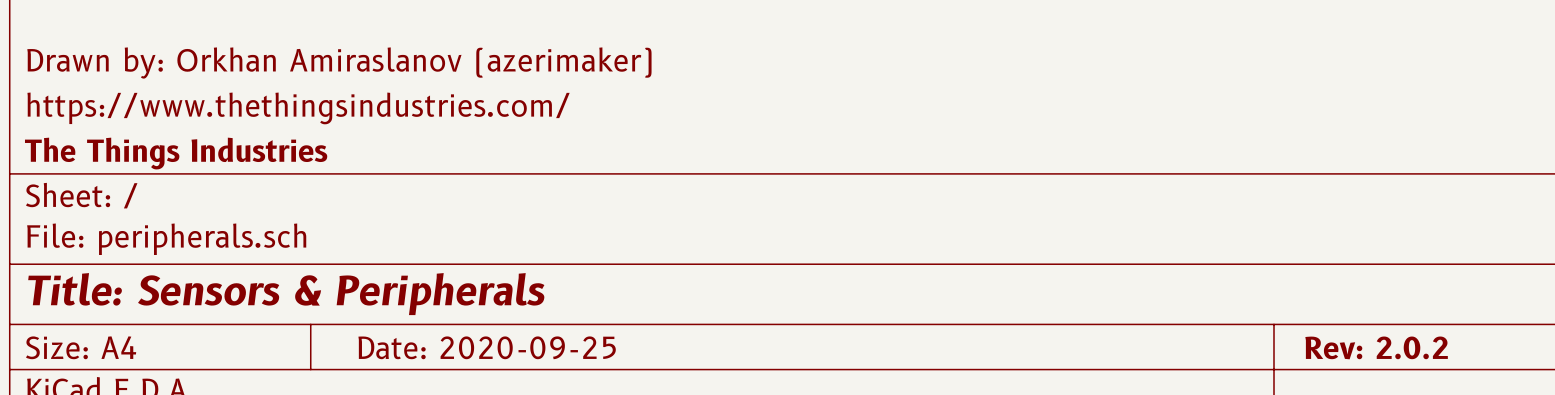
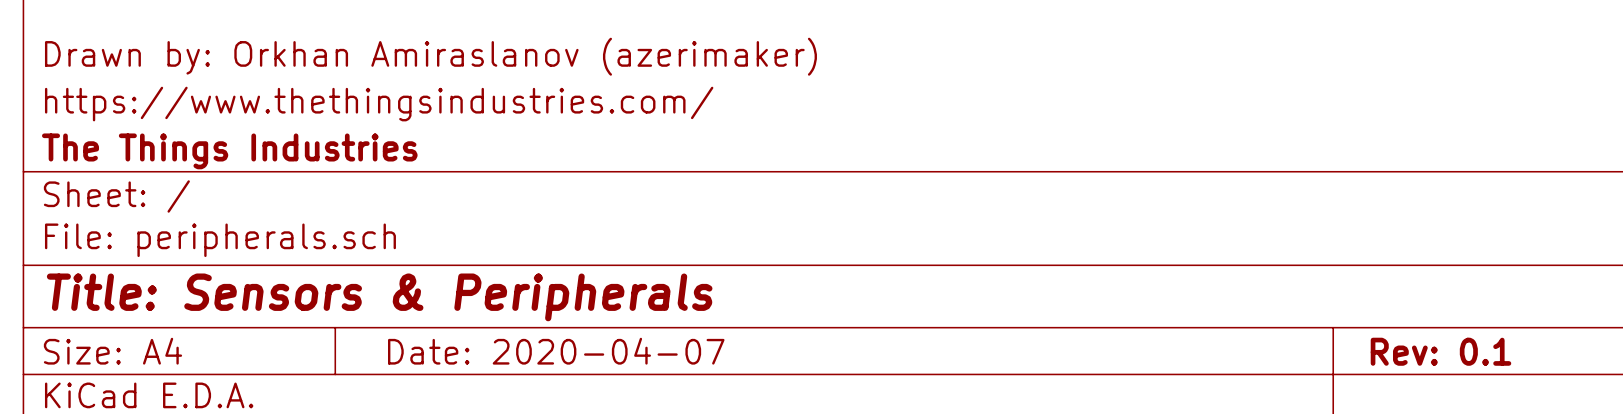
title block: Date: 2020-09-25 (487, 347) -> Date: 2020-04-07 (556, 351)
title block: Rev: 2.0.2 (1376, 347) -> Rev: 0.1 (1440, 351)

